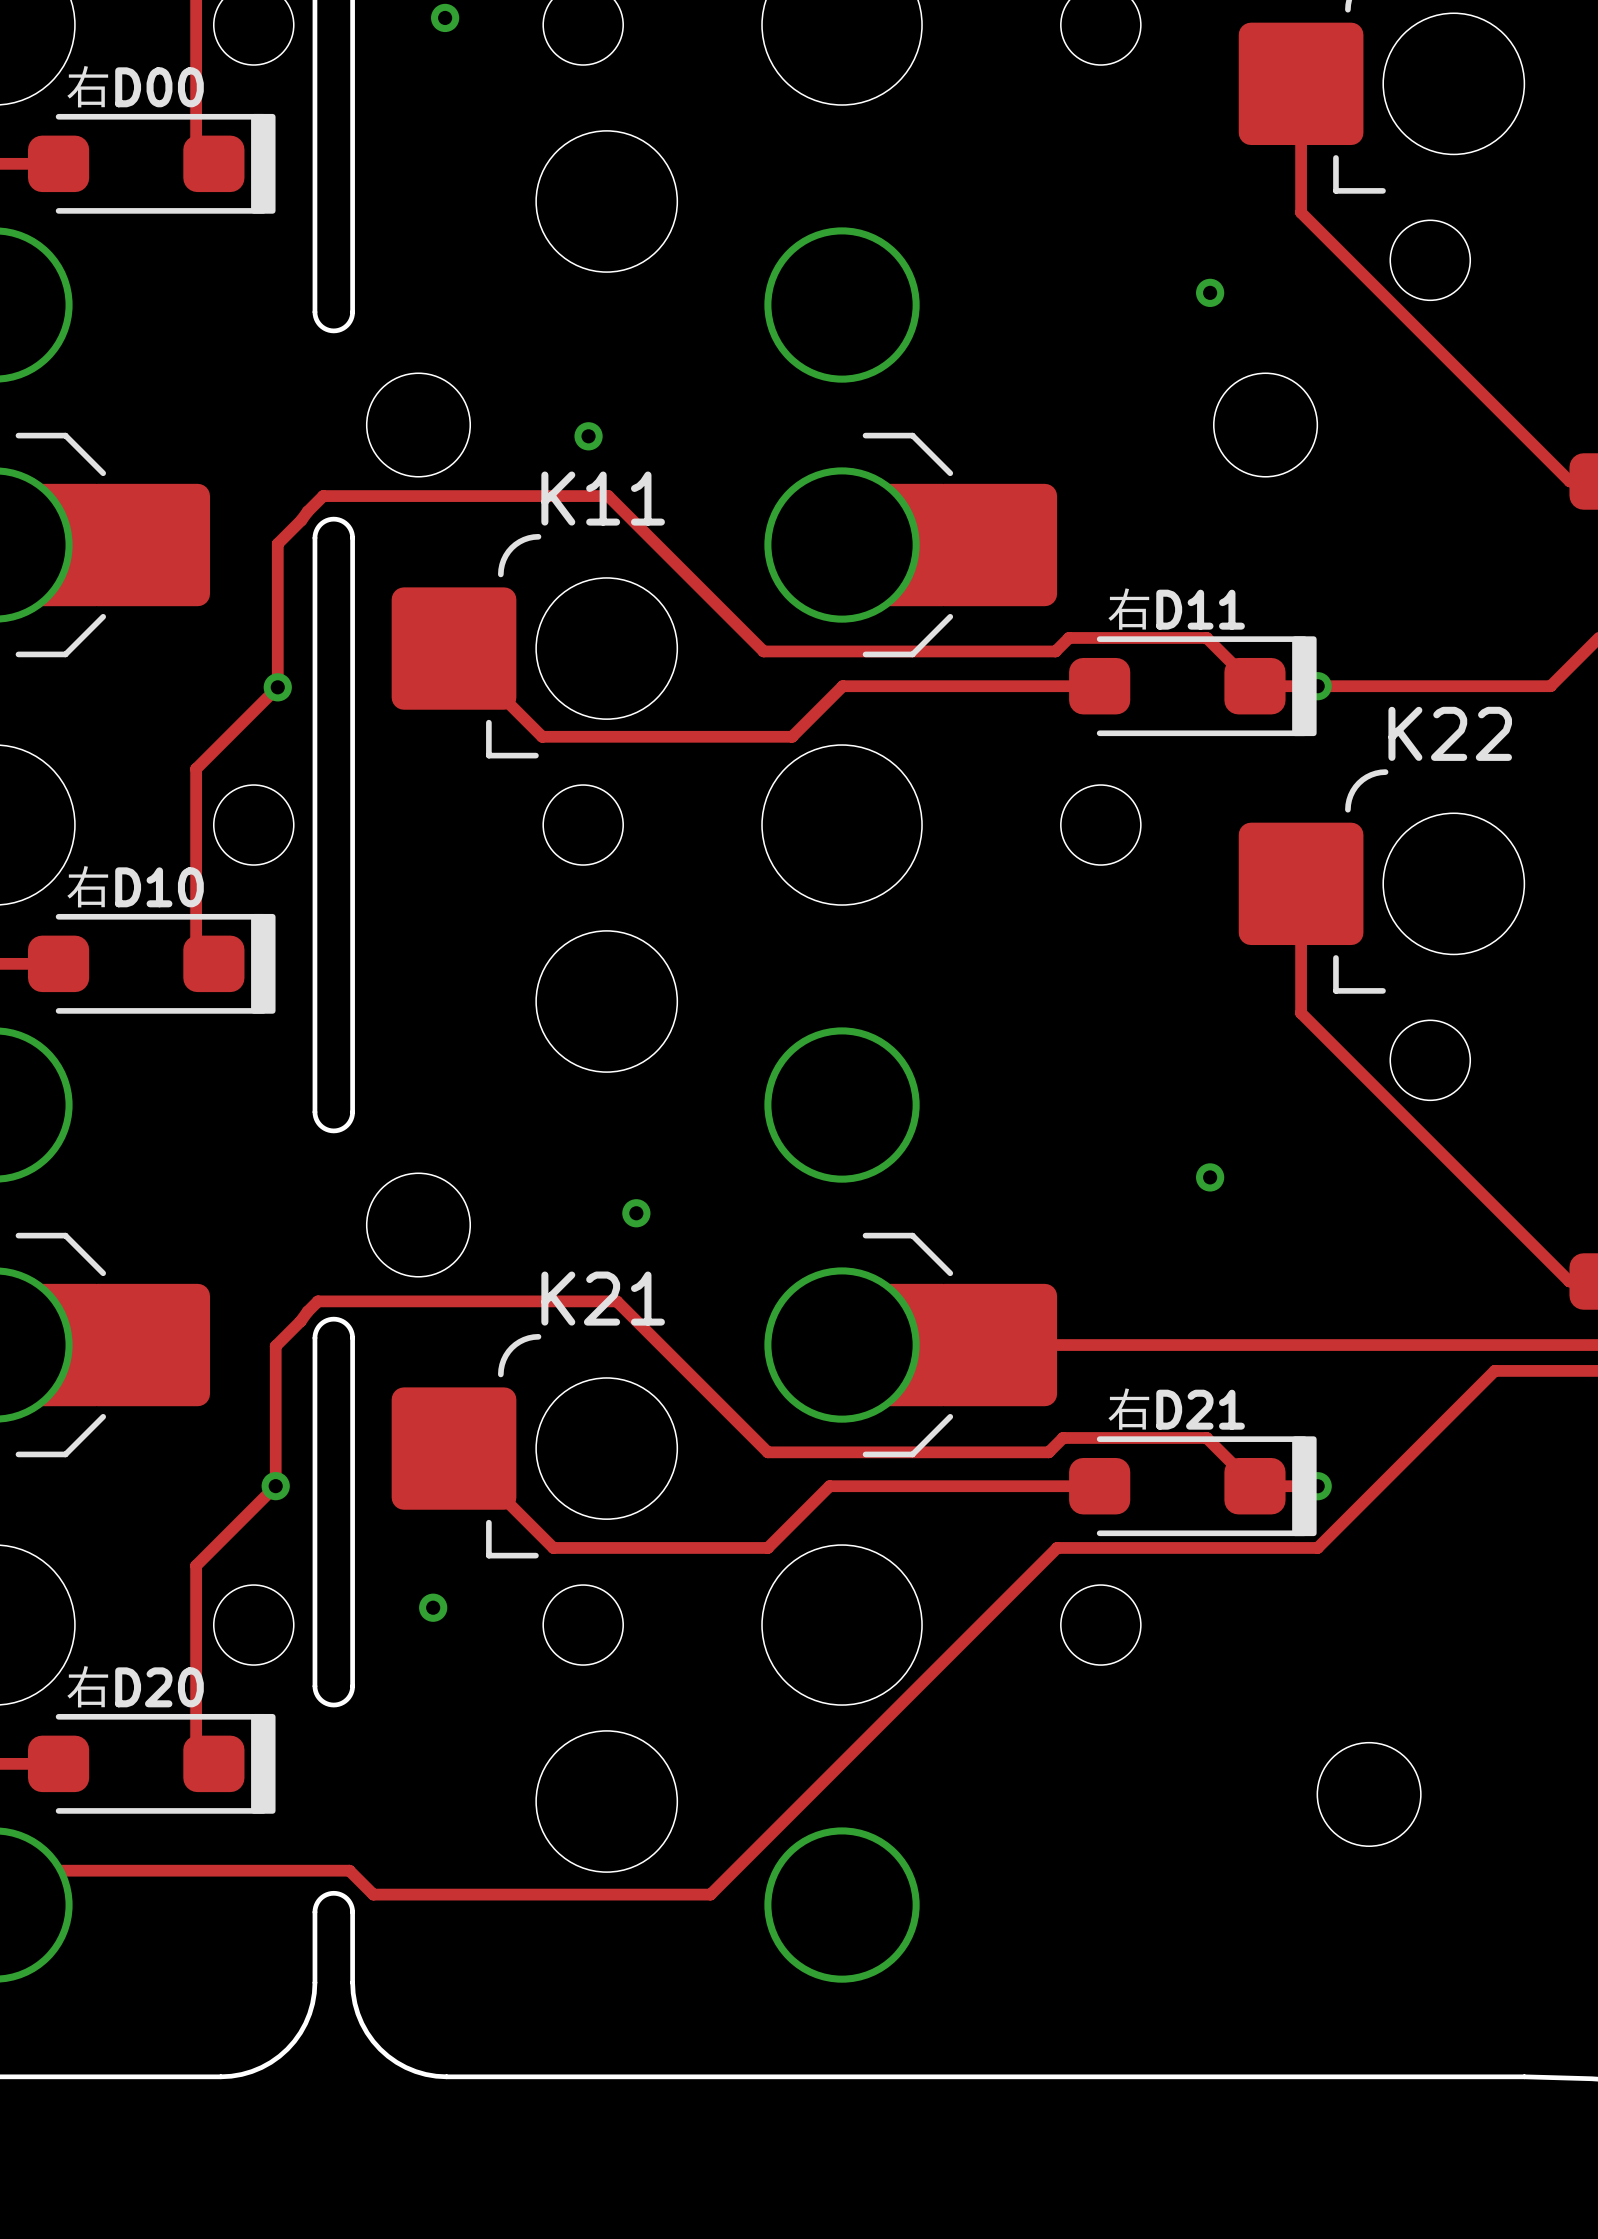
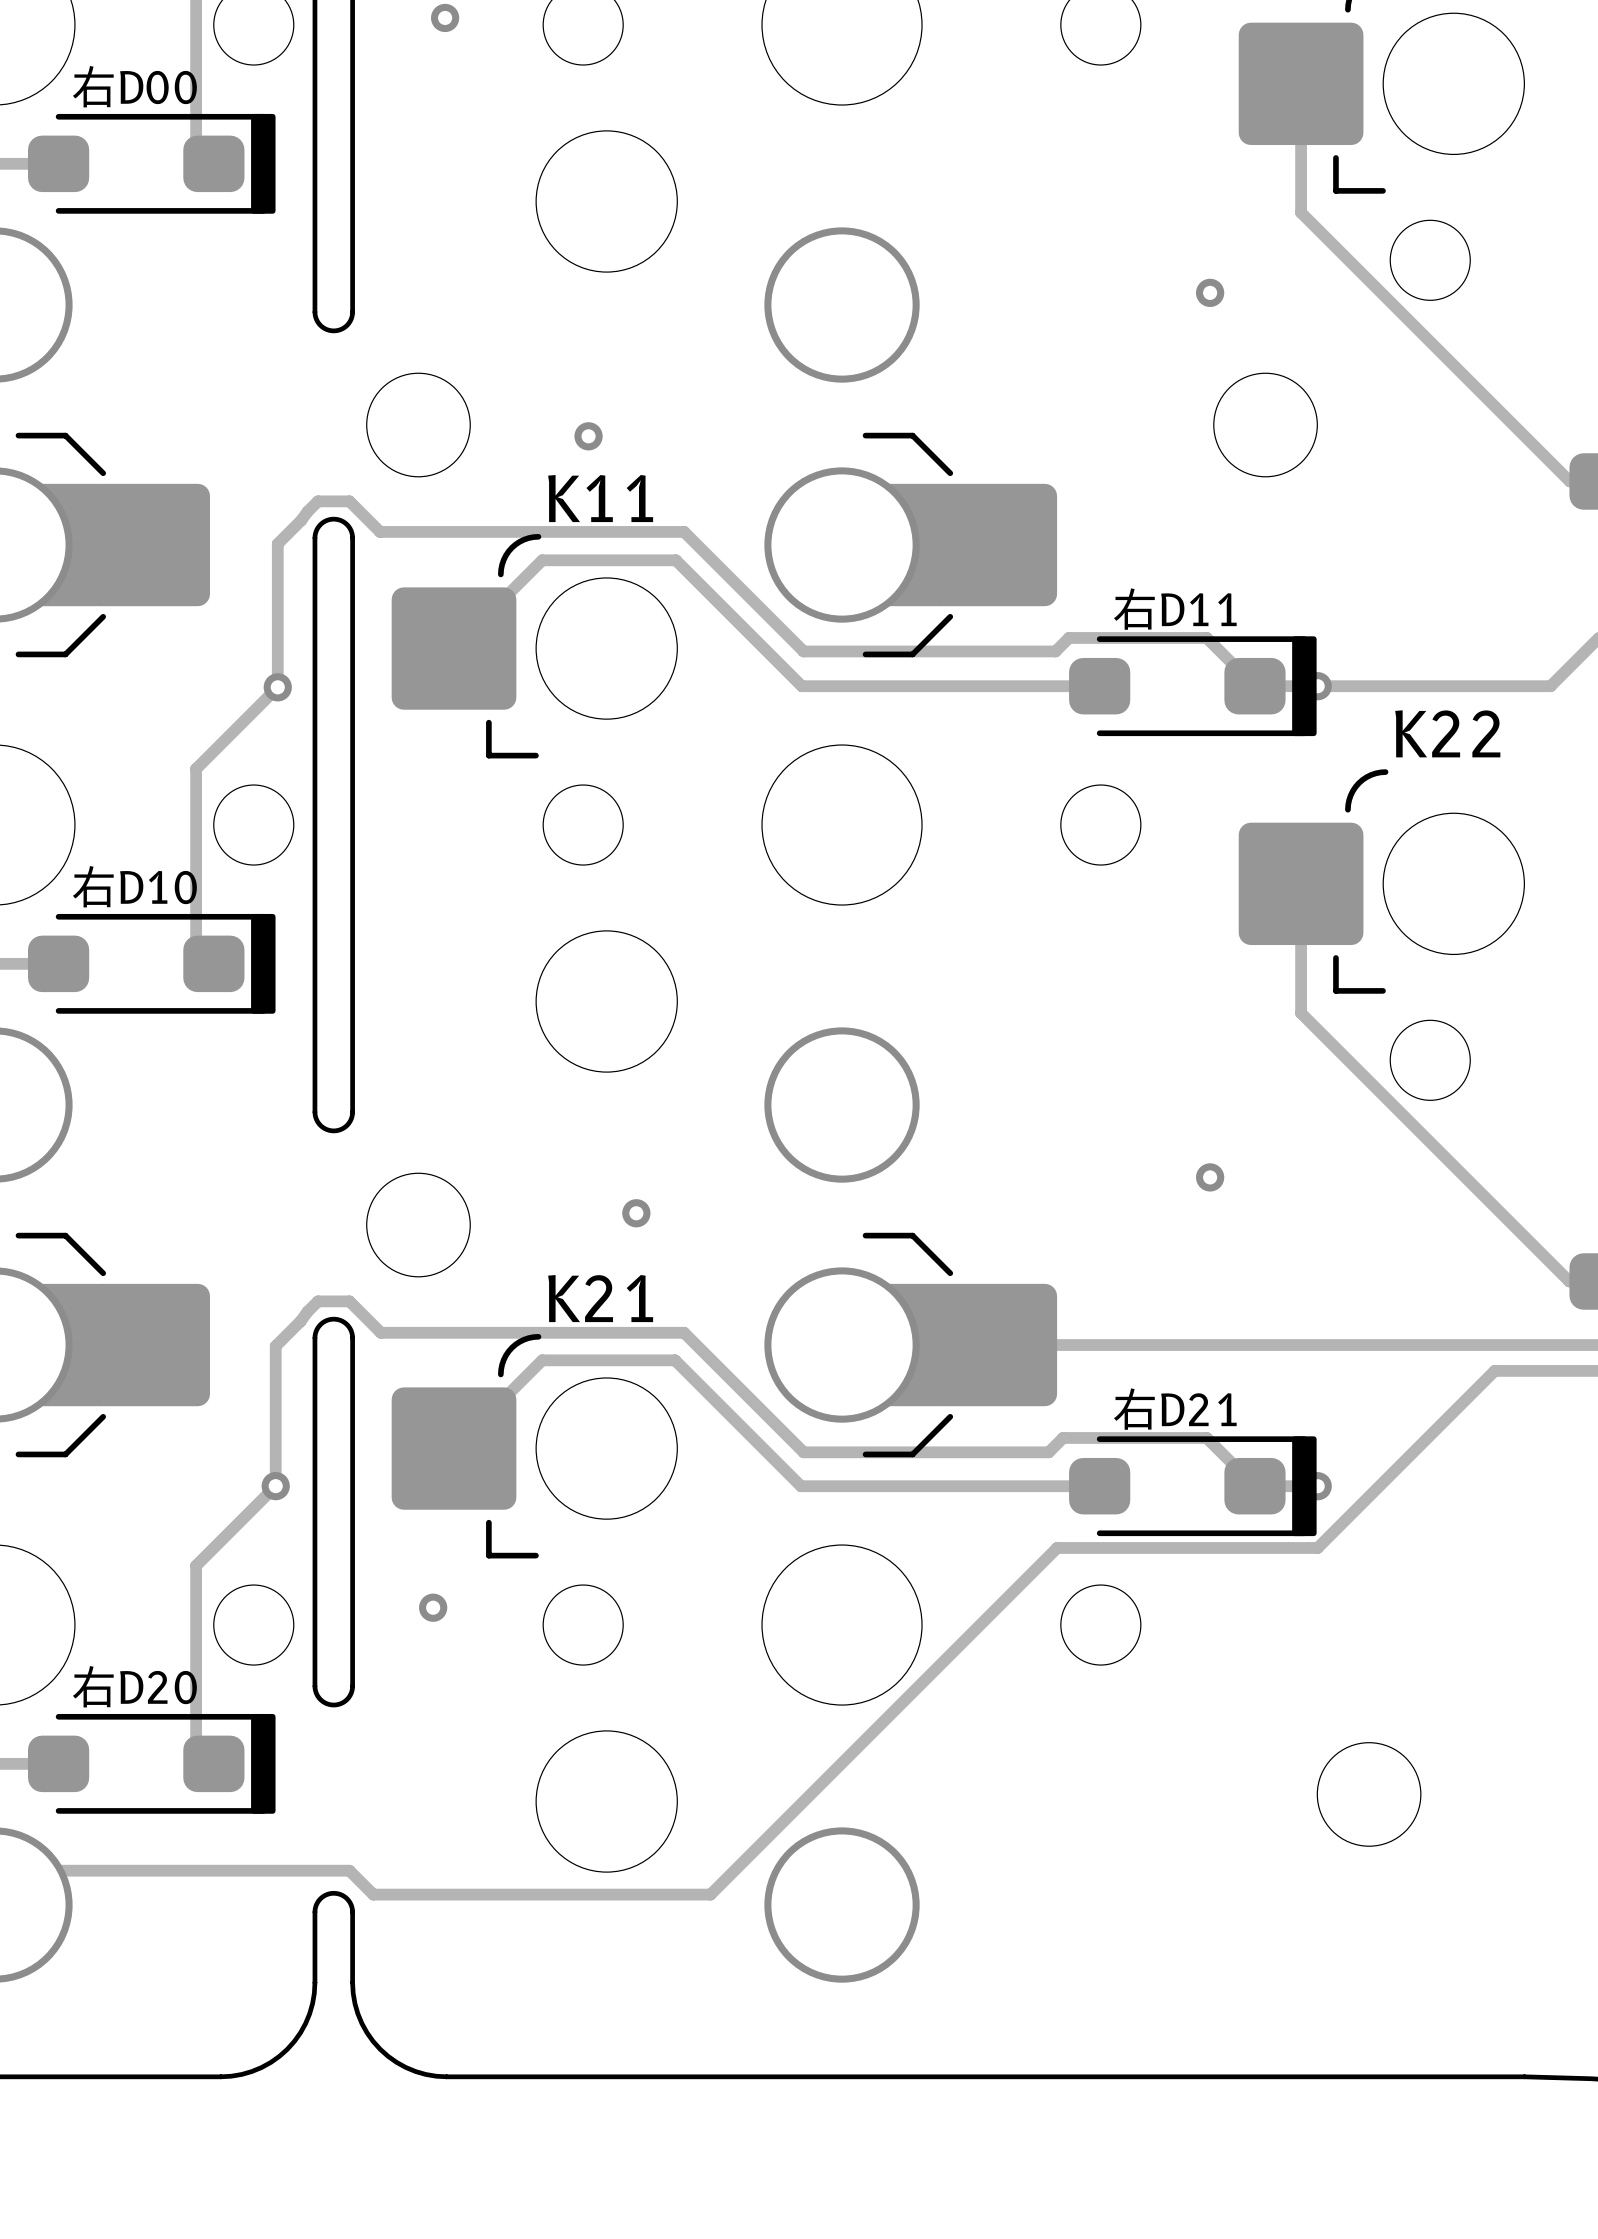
track: (317, 501) (323, 496) (608, 496) (763, 651) (803, 651) -> (317, 501) (349, 501) (380, 531) (684, 531) (803, 651)
track: (454, 648) (542, 736) (792, 736) (842, 686) -> (454, 648) (542, 560) (675, 560) (801, 686) (842, 686)
track: (349, 1301) (616, 1301) (767, 1452) (803, 1452) -> (349, 1301) (380, 1332) (684, 1332) (803, 1452)
track: (454, 1448) (553, 1547) (767, 1547) (829, 1486) -> (454, 1448) (542, 1360) (675, 1360) (800, 1486) (829, 1486)

